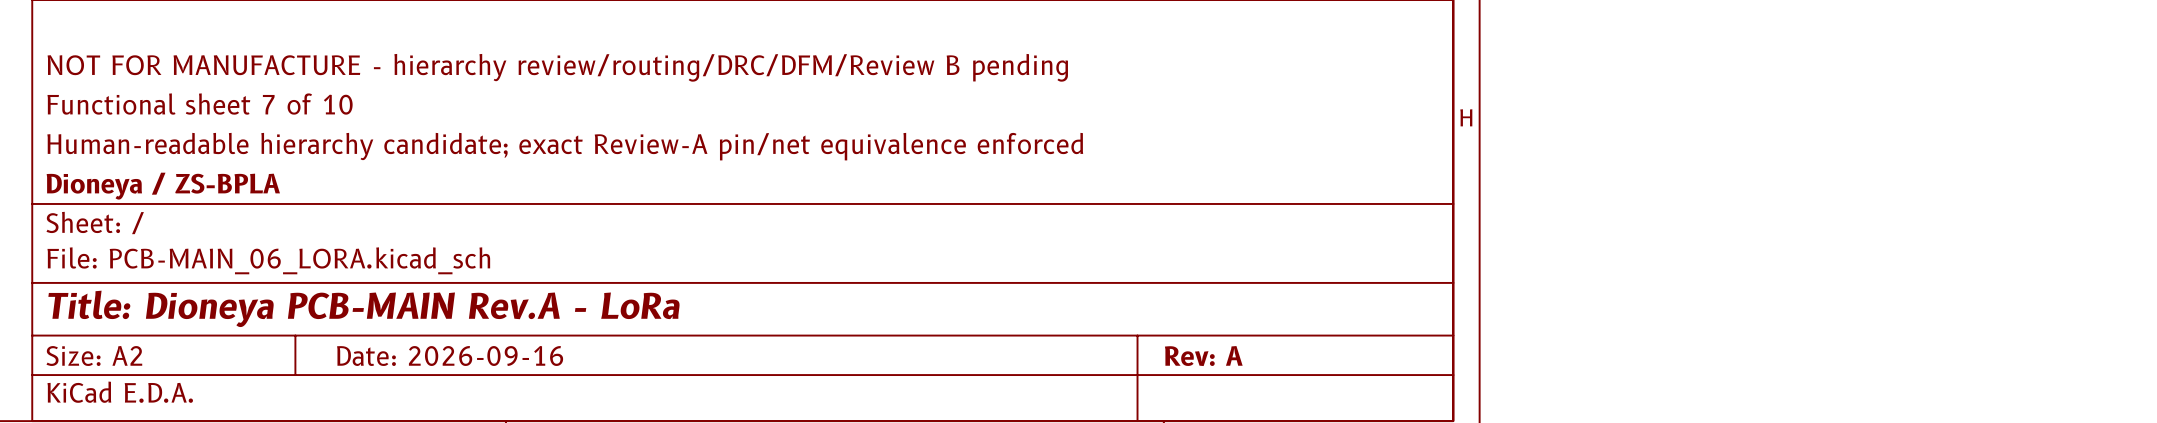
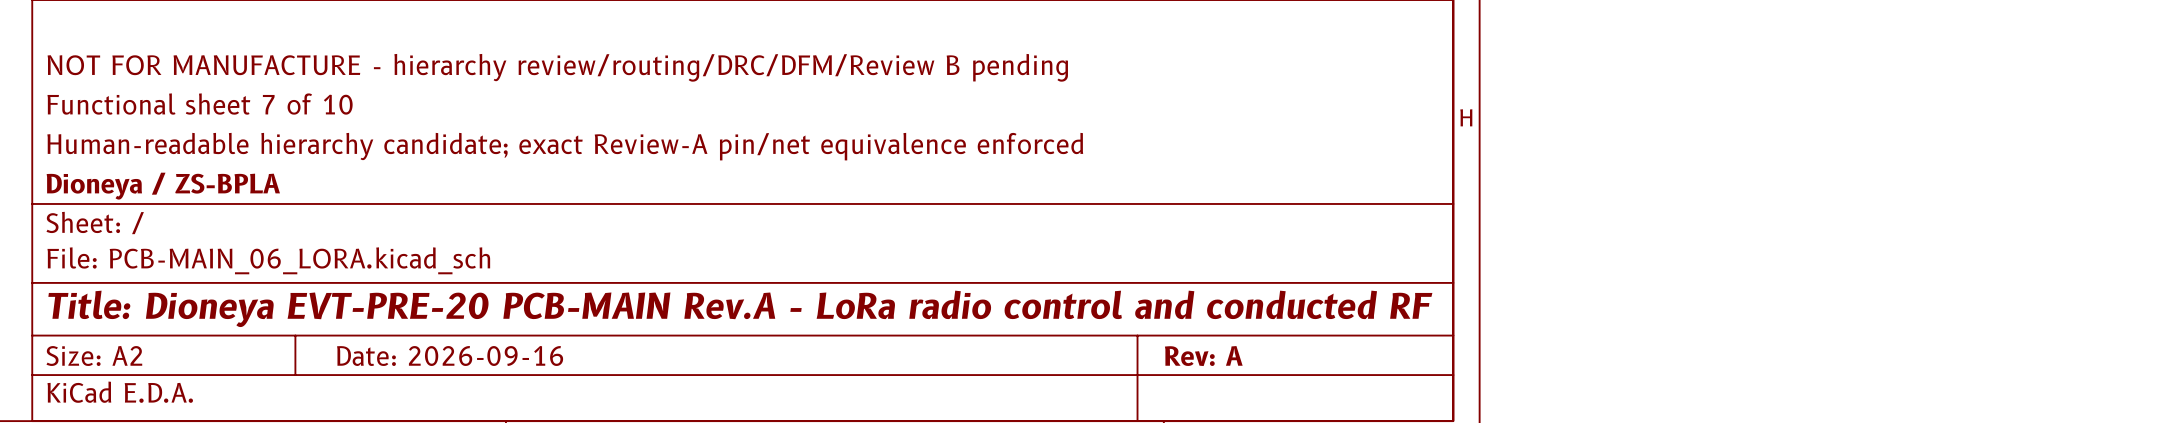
title block: Title: Dioneya PCB-MAIN Rev.A - LoRa (363, 308) -> Title: Dioneya EVT-PRE-20 PCB-MAIN Rev.A - LoRa radio control and conducted RF (740, 308)

